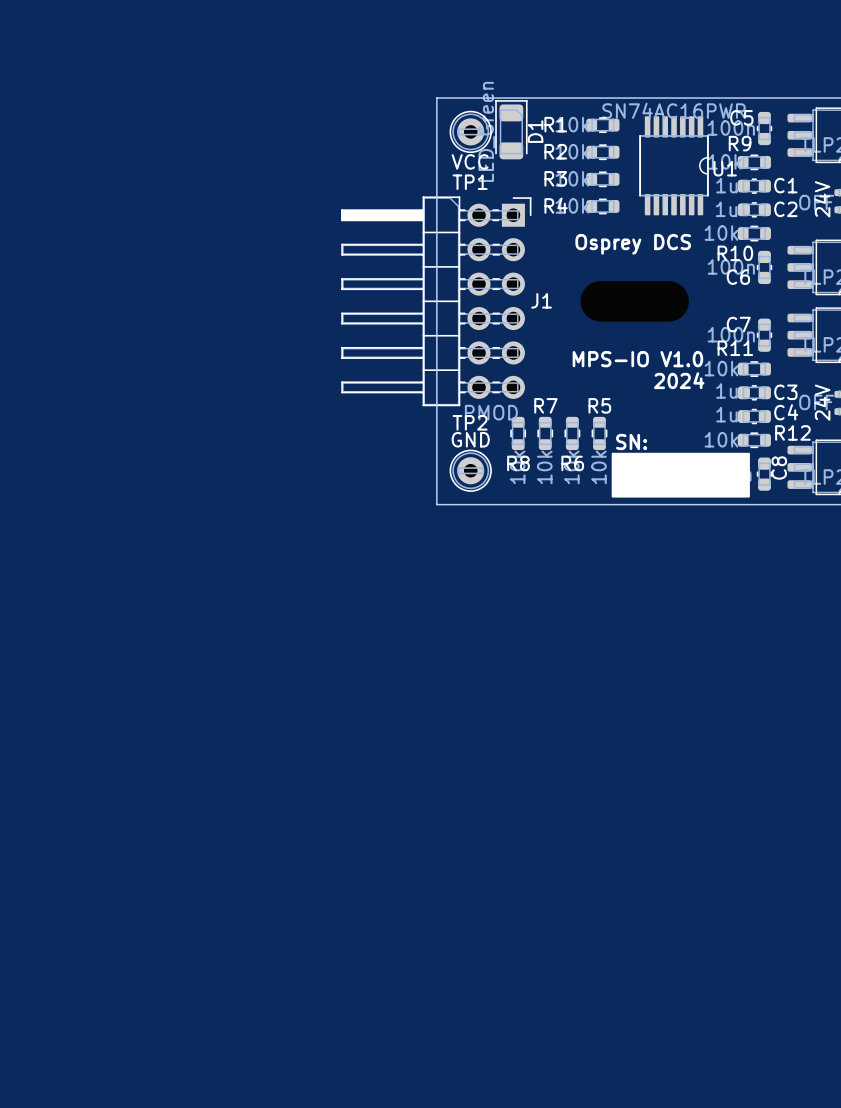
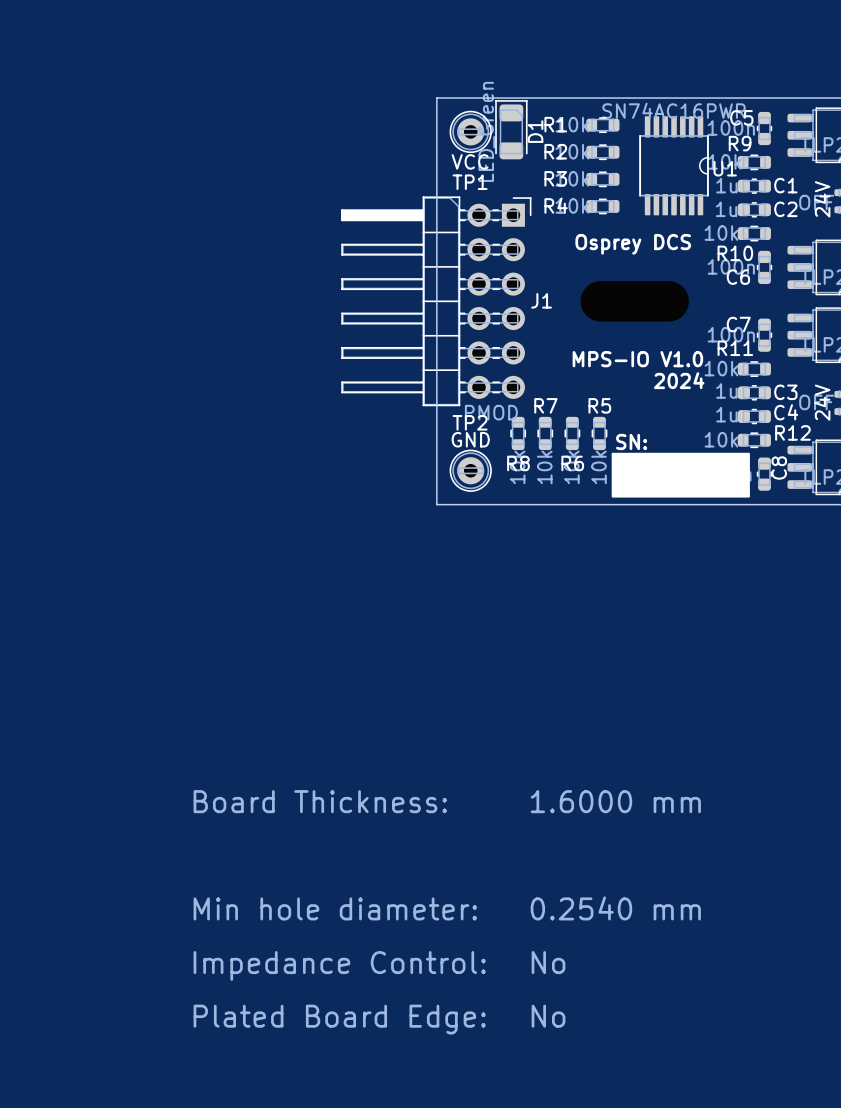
text: none -> Board Thickness: (320, 801)
text: none -> 1.6000 mm (615, 801)
text: none -> Min hole diameter: (335, 908)
text: none -> 0.2540 mm (615, 908)
text: none -> No (548, 962)
text: none -> Impedance Control: (339, 965)
text: none -> No (548, 1016)
text: none -> Plated Board Edge: (339, 1019)

